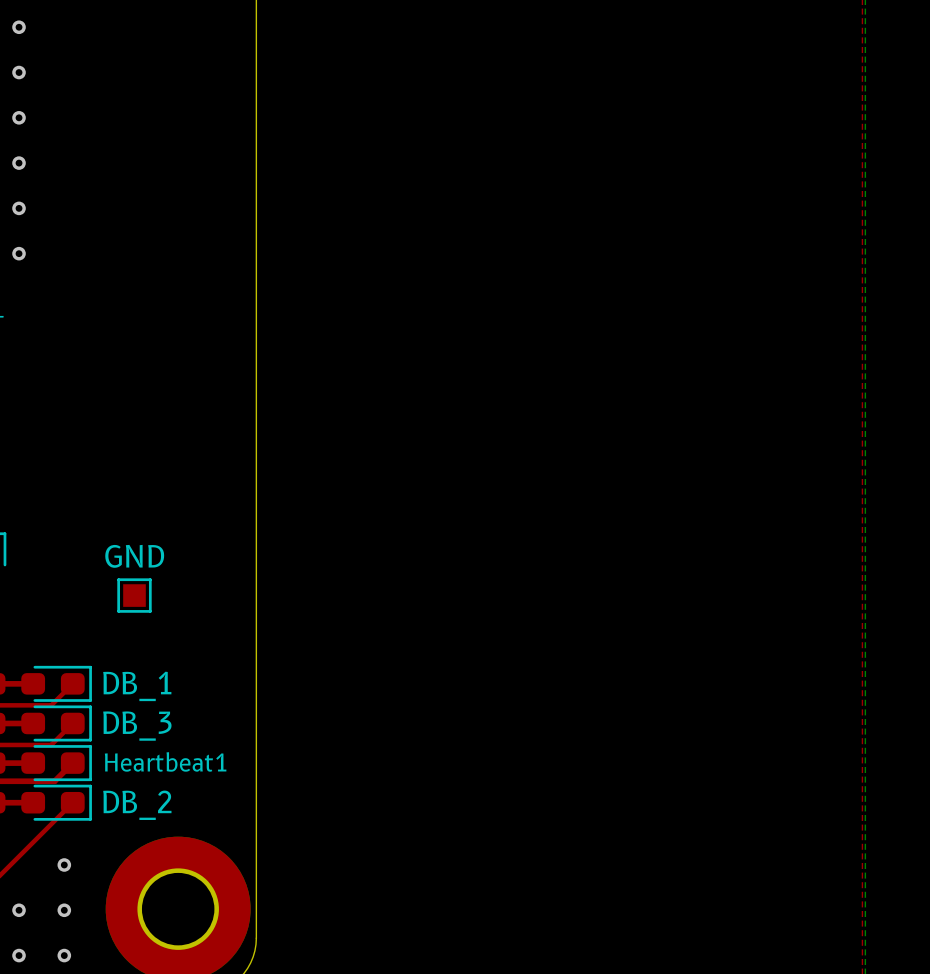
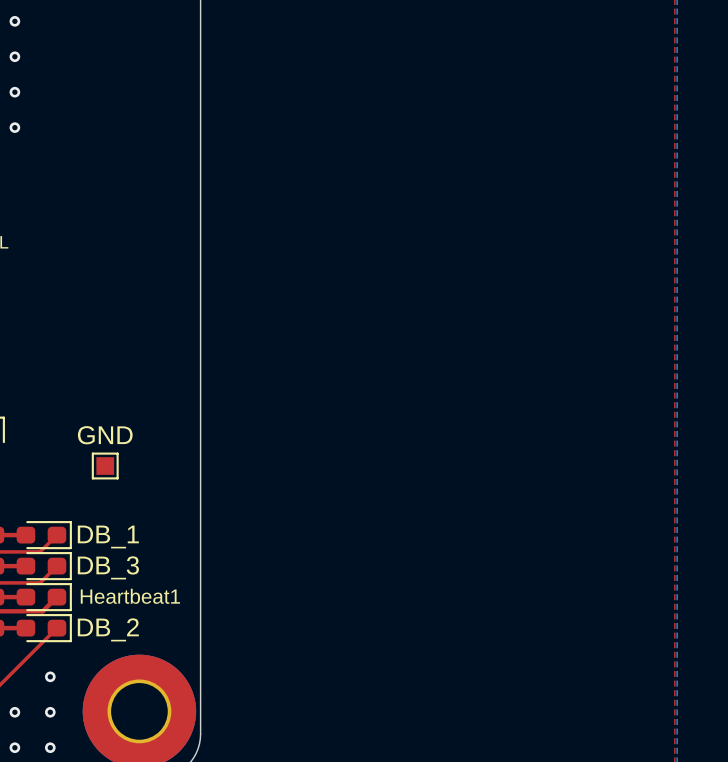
via: (19, 208) -> none
via: (19, 253) -> none

